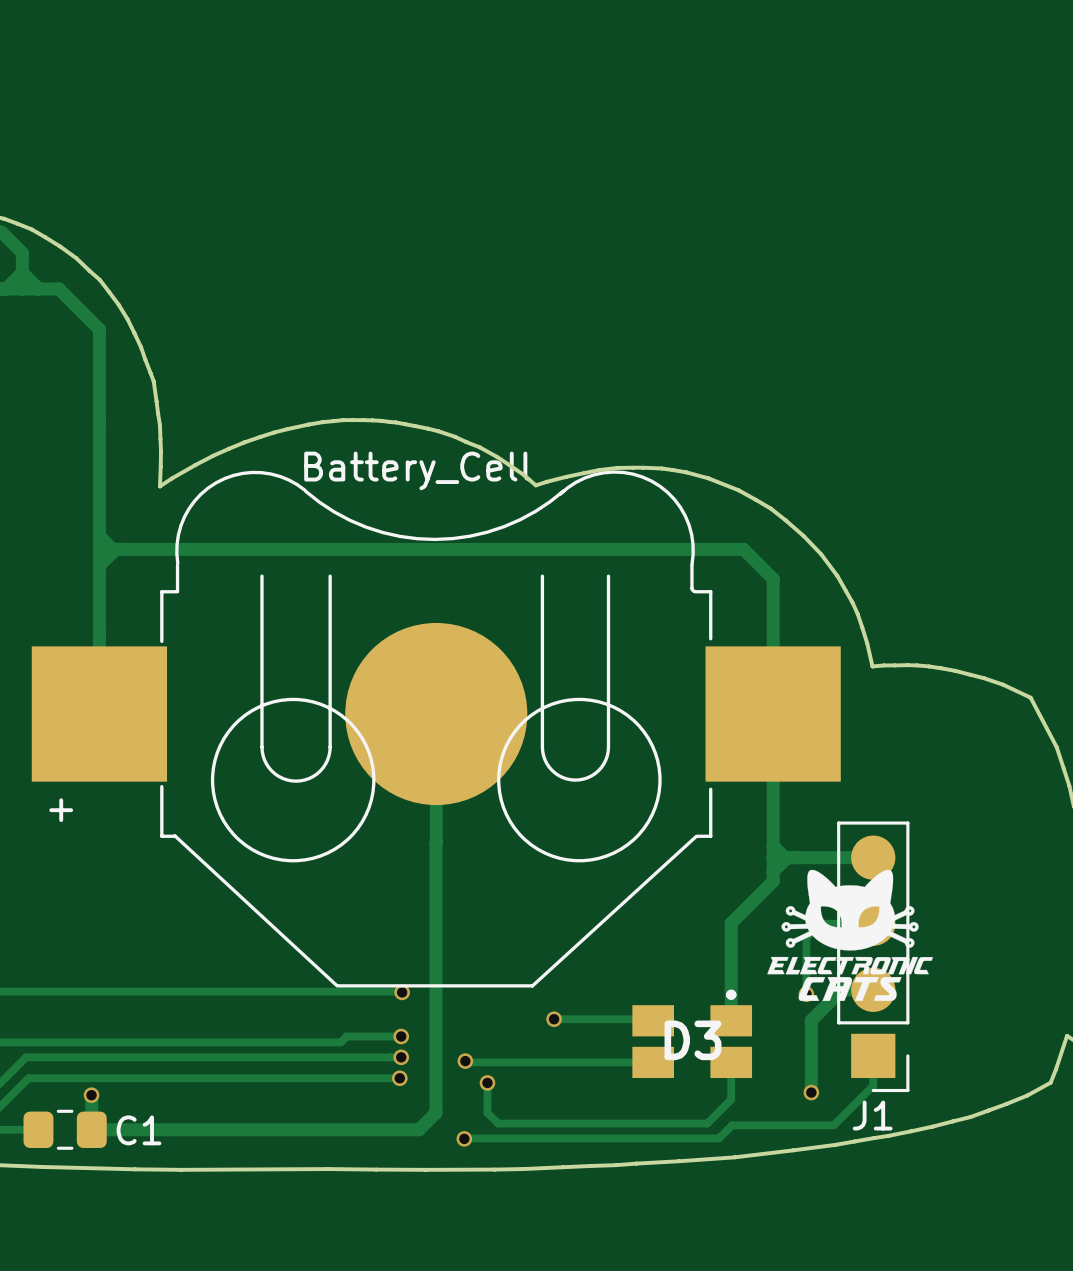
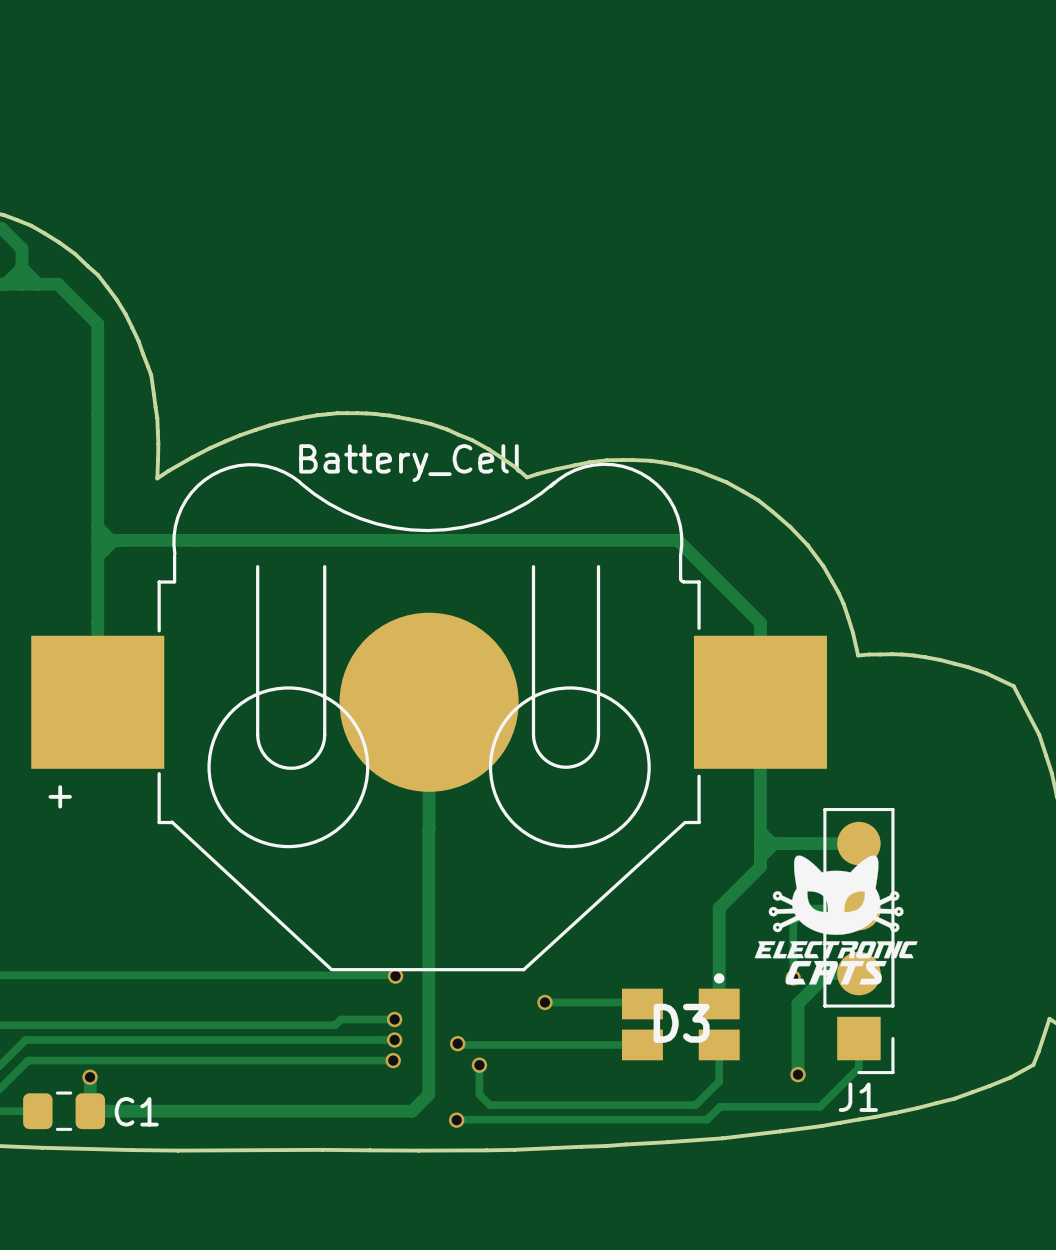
track: (689, 549) (743, 549) (773, 578) (773, 633) -> (677, 540) (760, 622)

